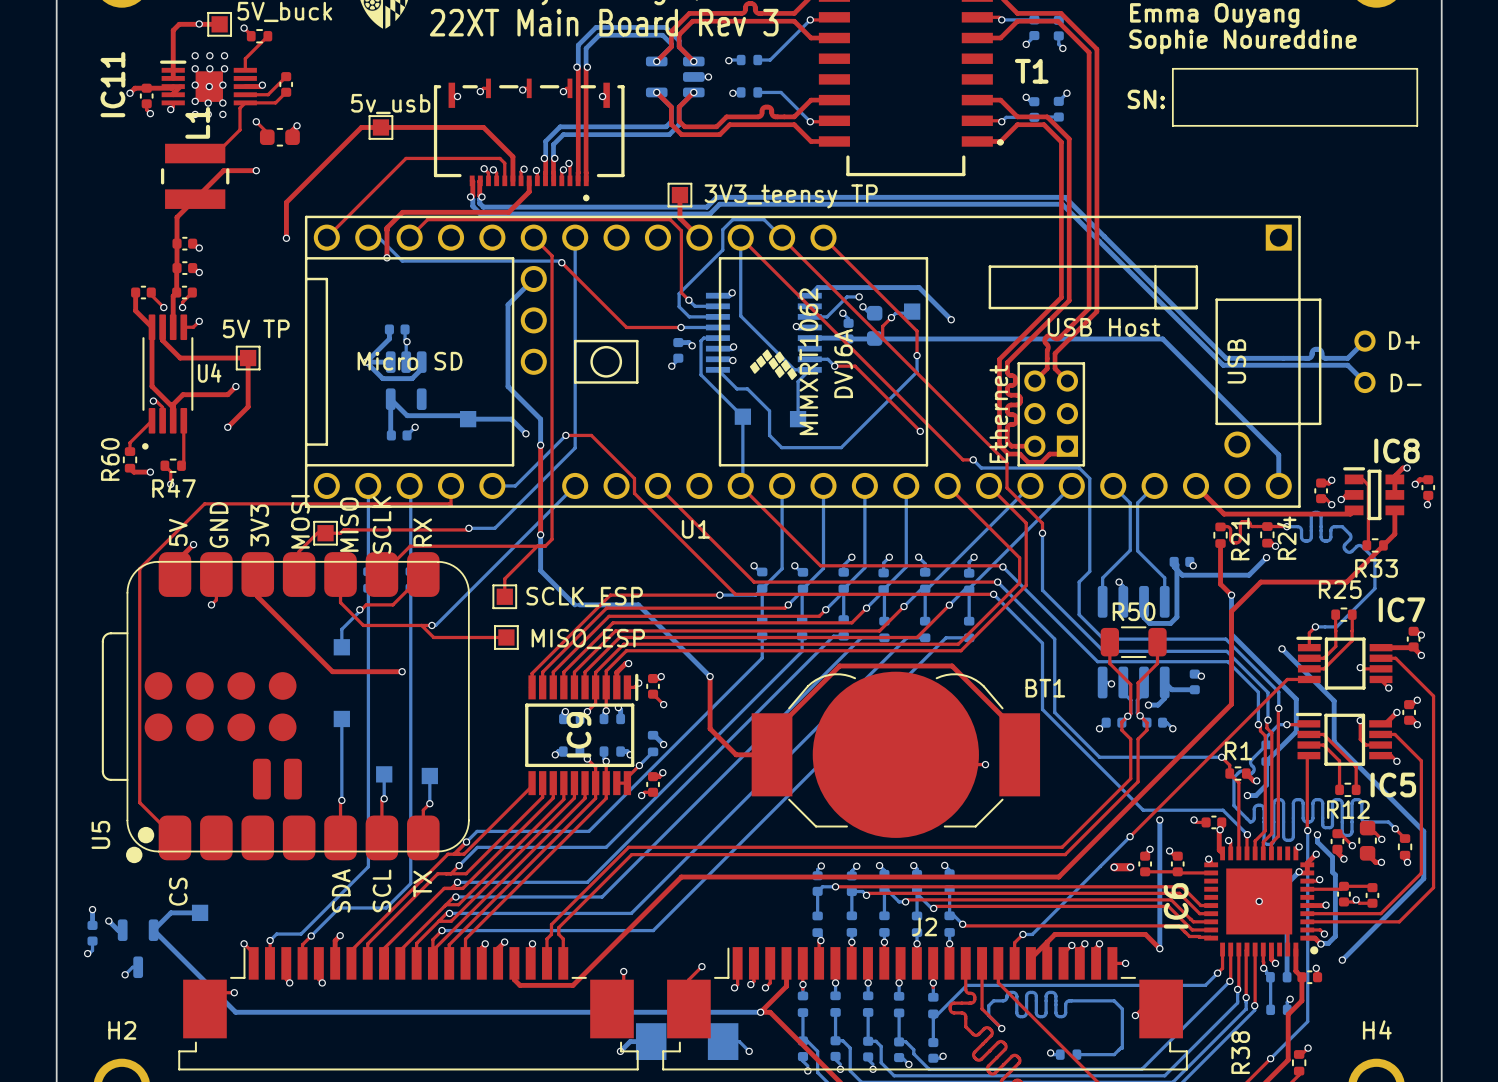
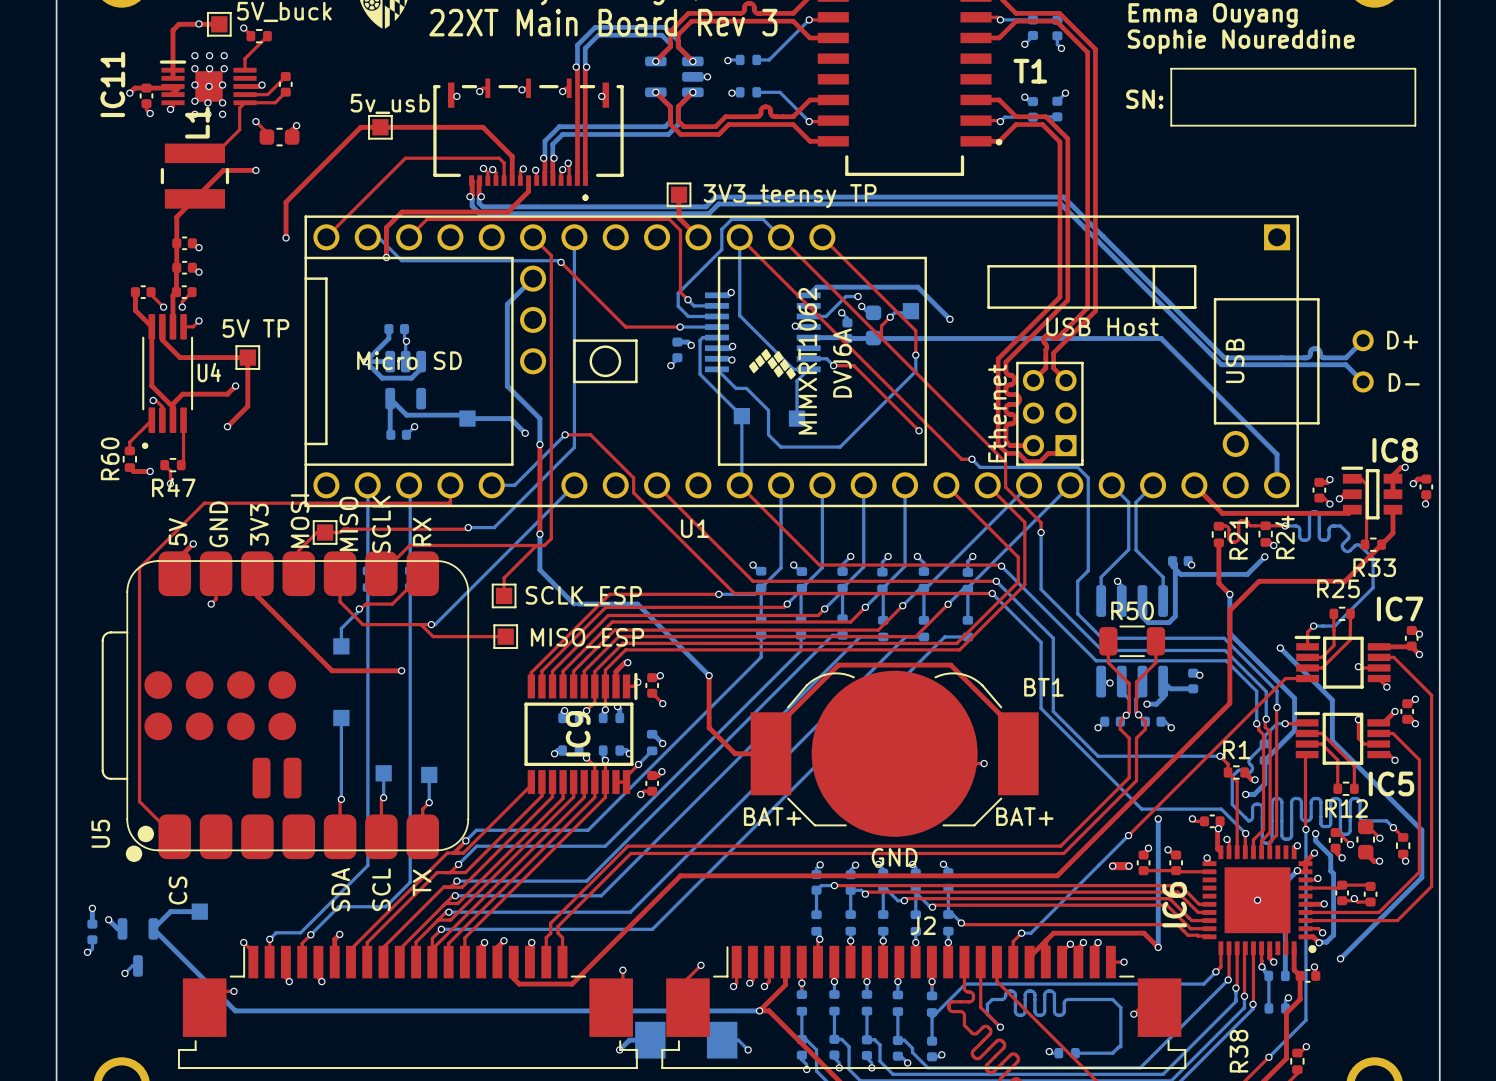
text: none -> BAT+ (772, 816)
text: none -> BAT+ (1024, 816)
text: none -> GND (894, 857)
H2 name: H2 (122, 1030) -> none
H4 name: H4 (1377, 1030) -> none

